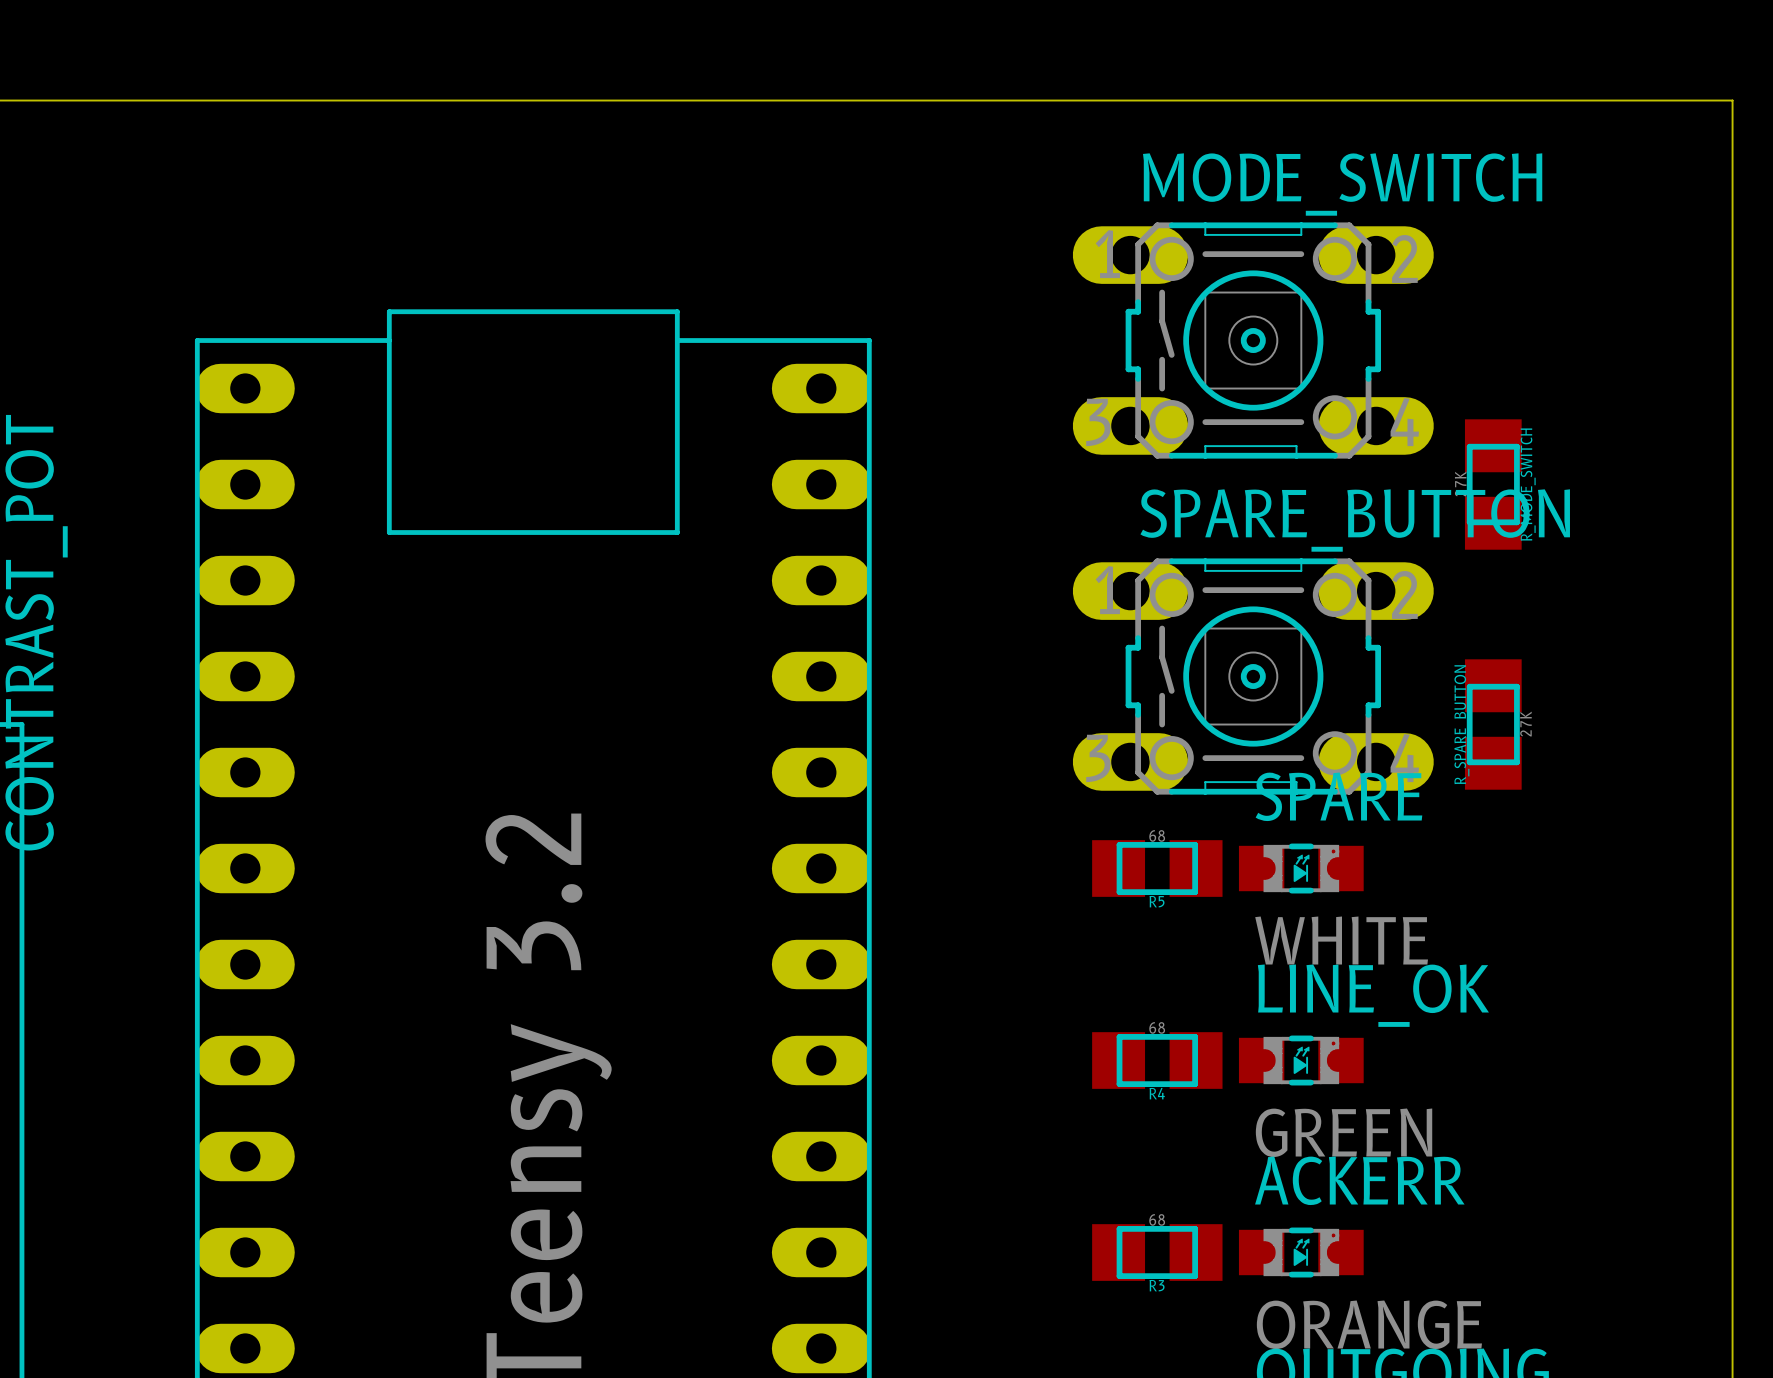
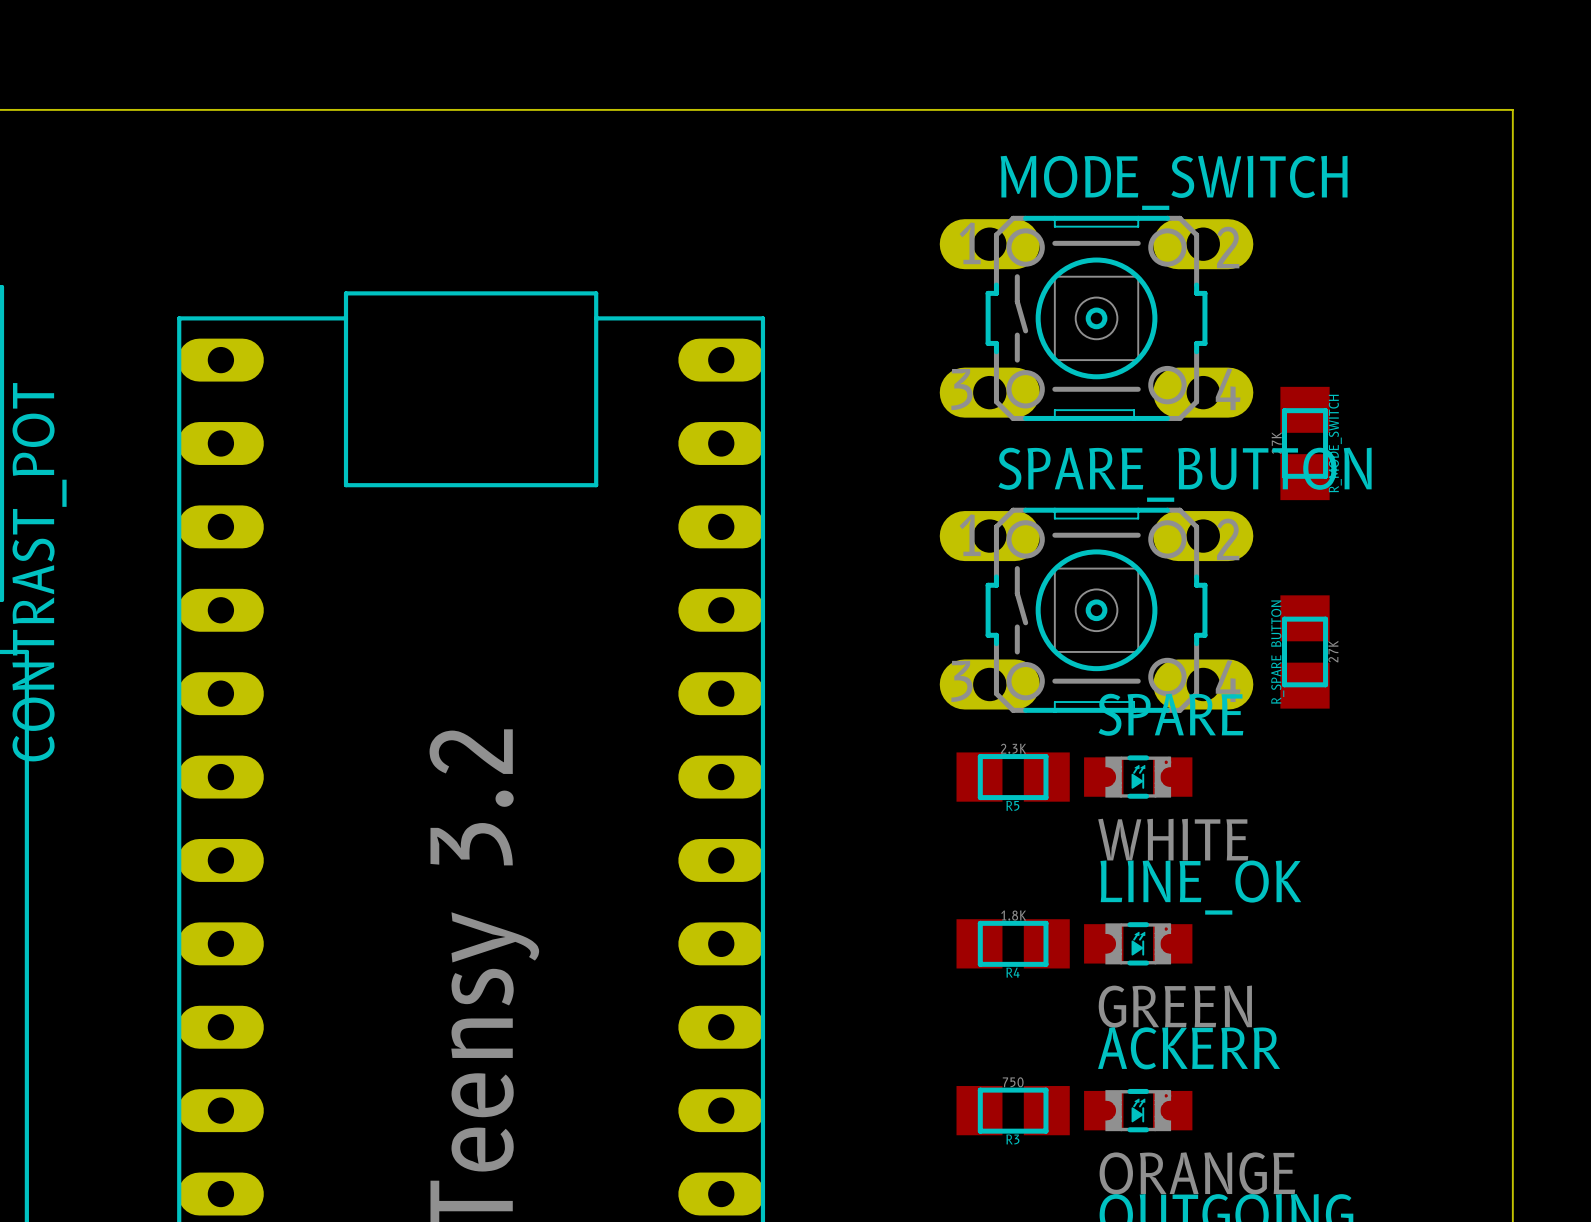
R5 value: 68 (1157, 835) -> 2.3K (1013, 748)
R4 value: 68 (1157, 1027) -> 1.8K (1013, 915)
R3 value: 68 (1157, 1219) -> 750 (1013, 1082)

